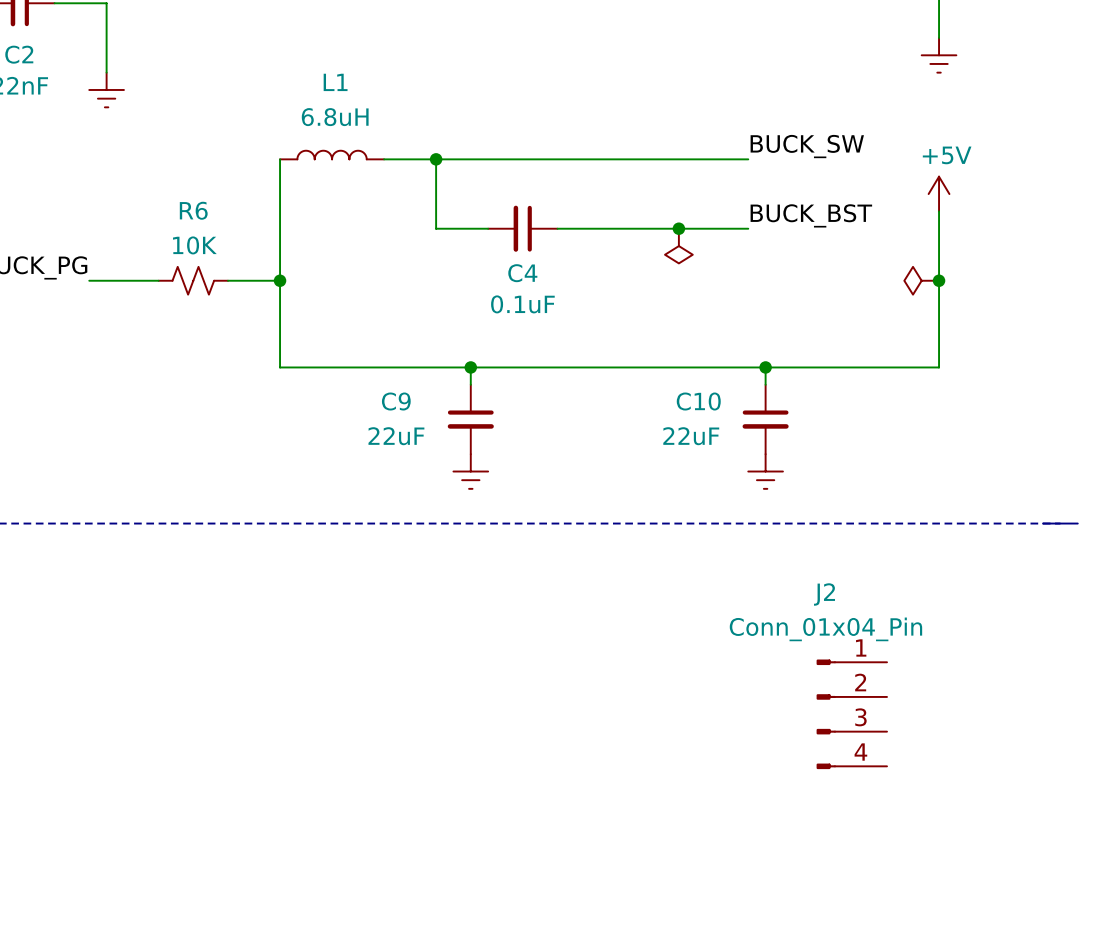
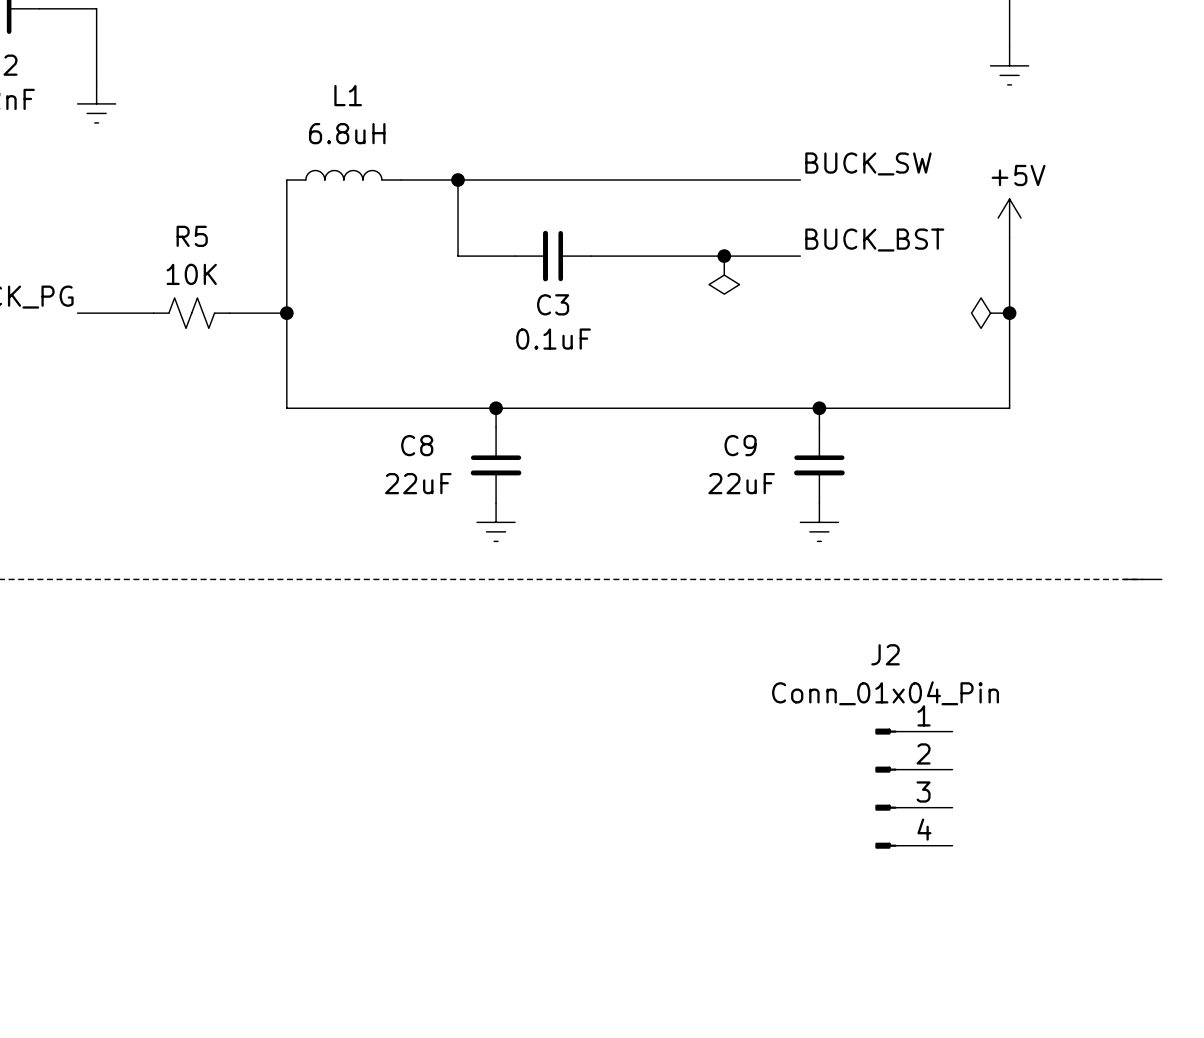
R6 name: R6 (193, 210) -> R5 (192, 236)
C4 name: C4 (522, 273) -> C3 (553, 304)
C9 name: C9 (396, 401) -> C8 (417, 445)
C10 name: C10 (698, 401) -> C9 (740, 445)

